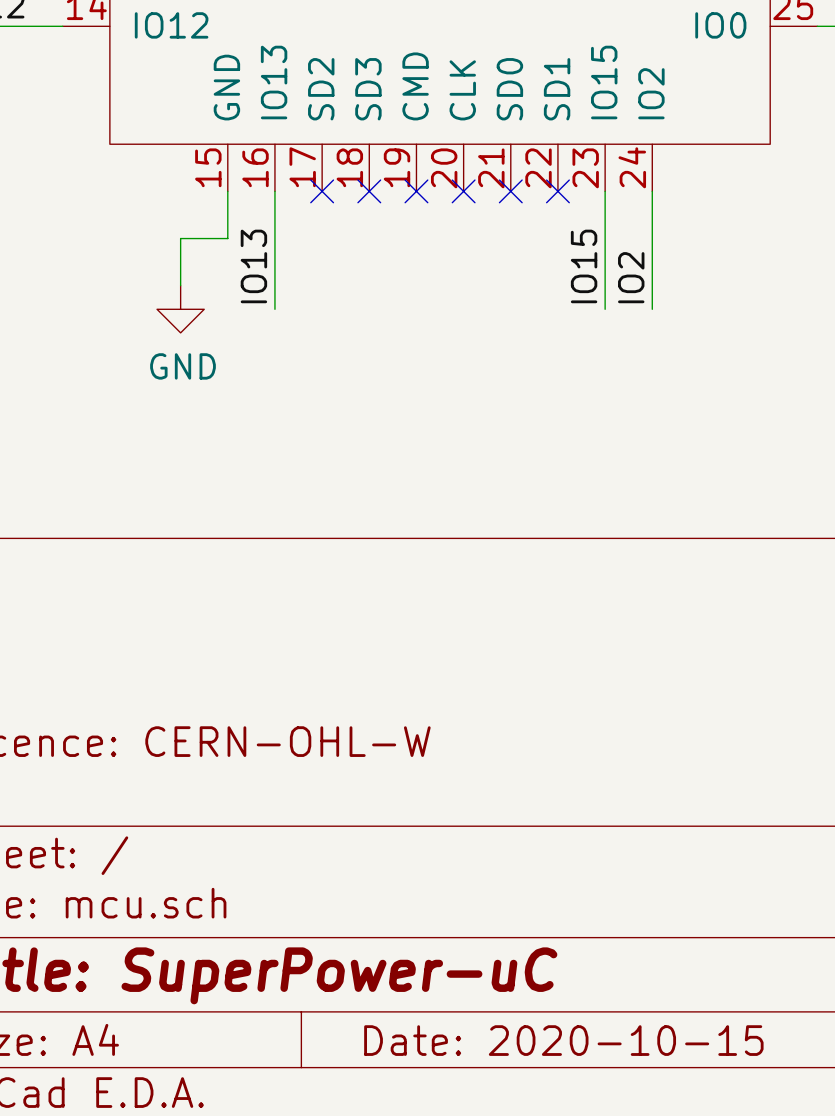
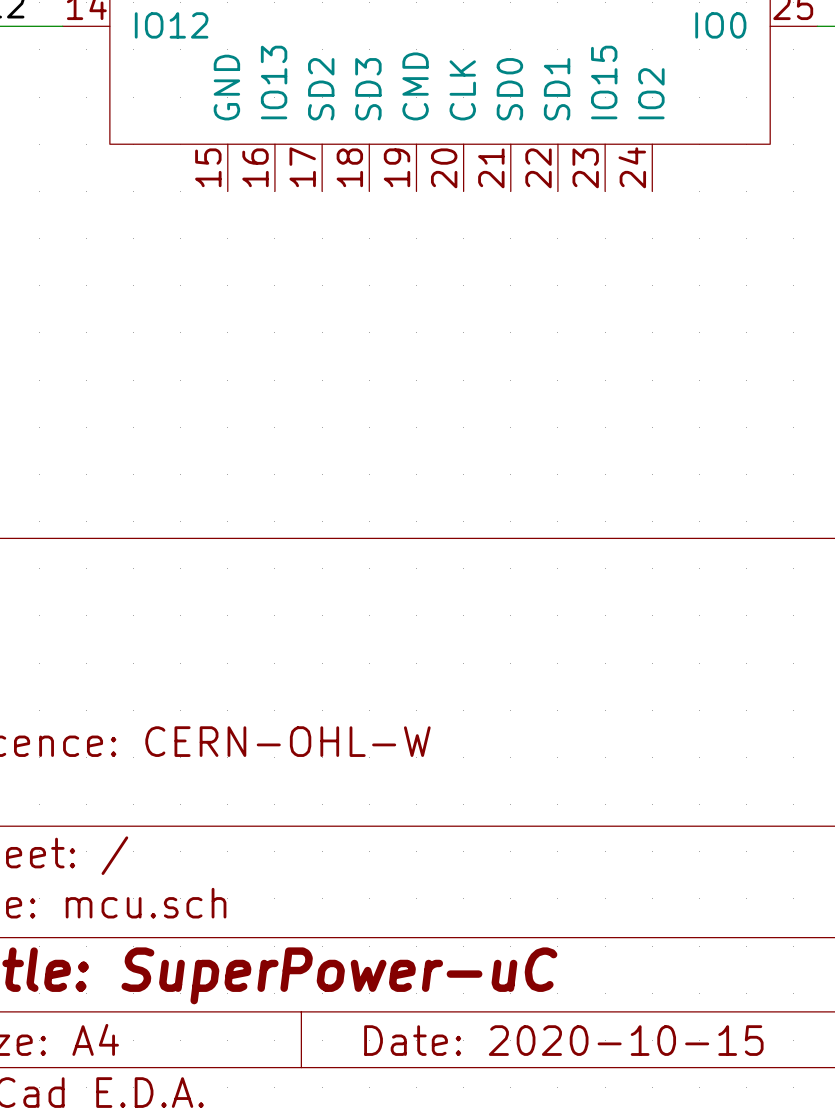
wire: (227, 191) (227, 238) (180, 238) (180, 285) -> none
wire: (274, 191) (274, 309) -> none
no-connect mark: (322, 191) -> none
no-connect mark: (369, 191) -> none
no-connect mark: (416, 191) -> none
no-connect mark: (463, 191) -> none
no-connect mark: (510, 191) -> none
no-connect mark: (557, 191) -> none
wire: (605, 191) (605, 309) -> none
wire: (652, 191) (652, 309) -> none
label: IO13 (253, 266) -> none
label: IO15 (584, 266) -> none
label: IO2 (631, 277) -> none
power symbol: GND (180, 309) -> none

